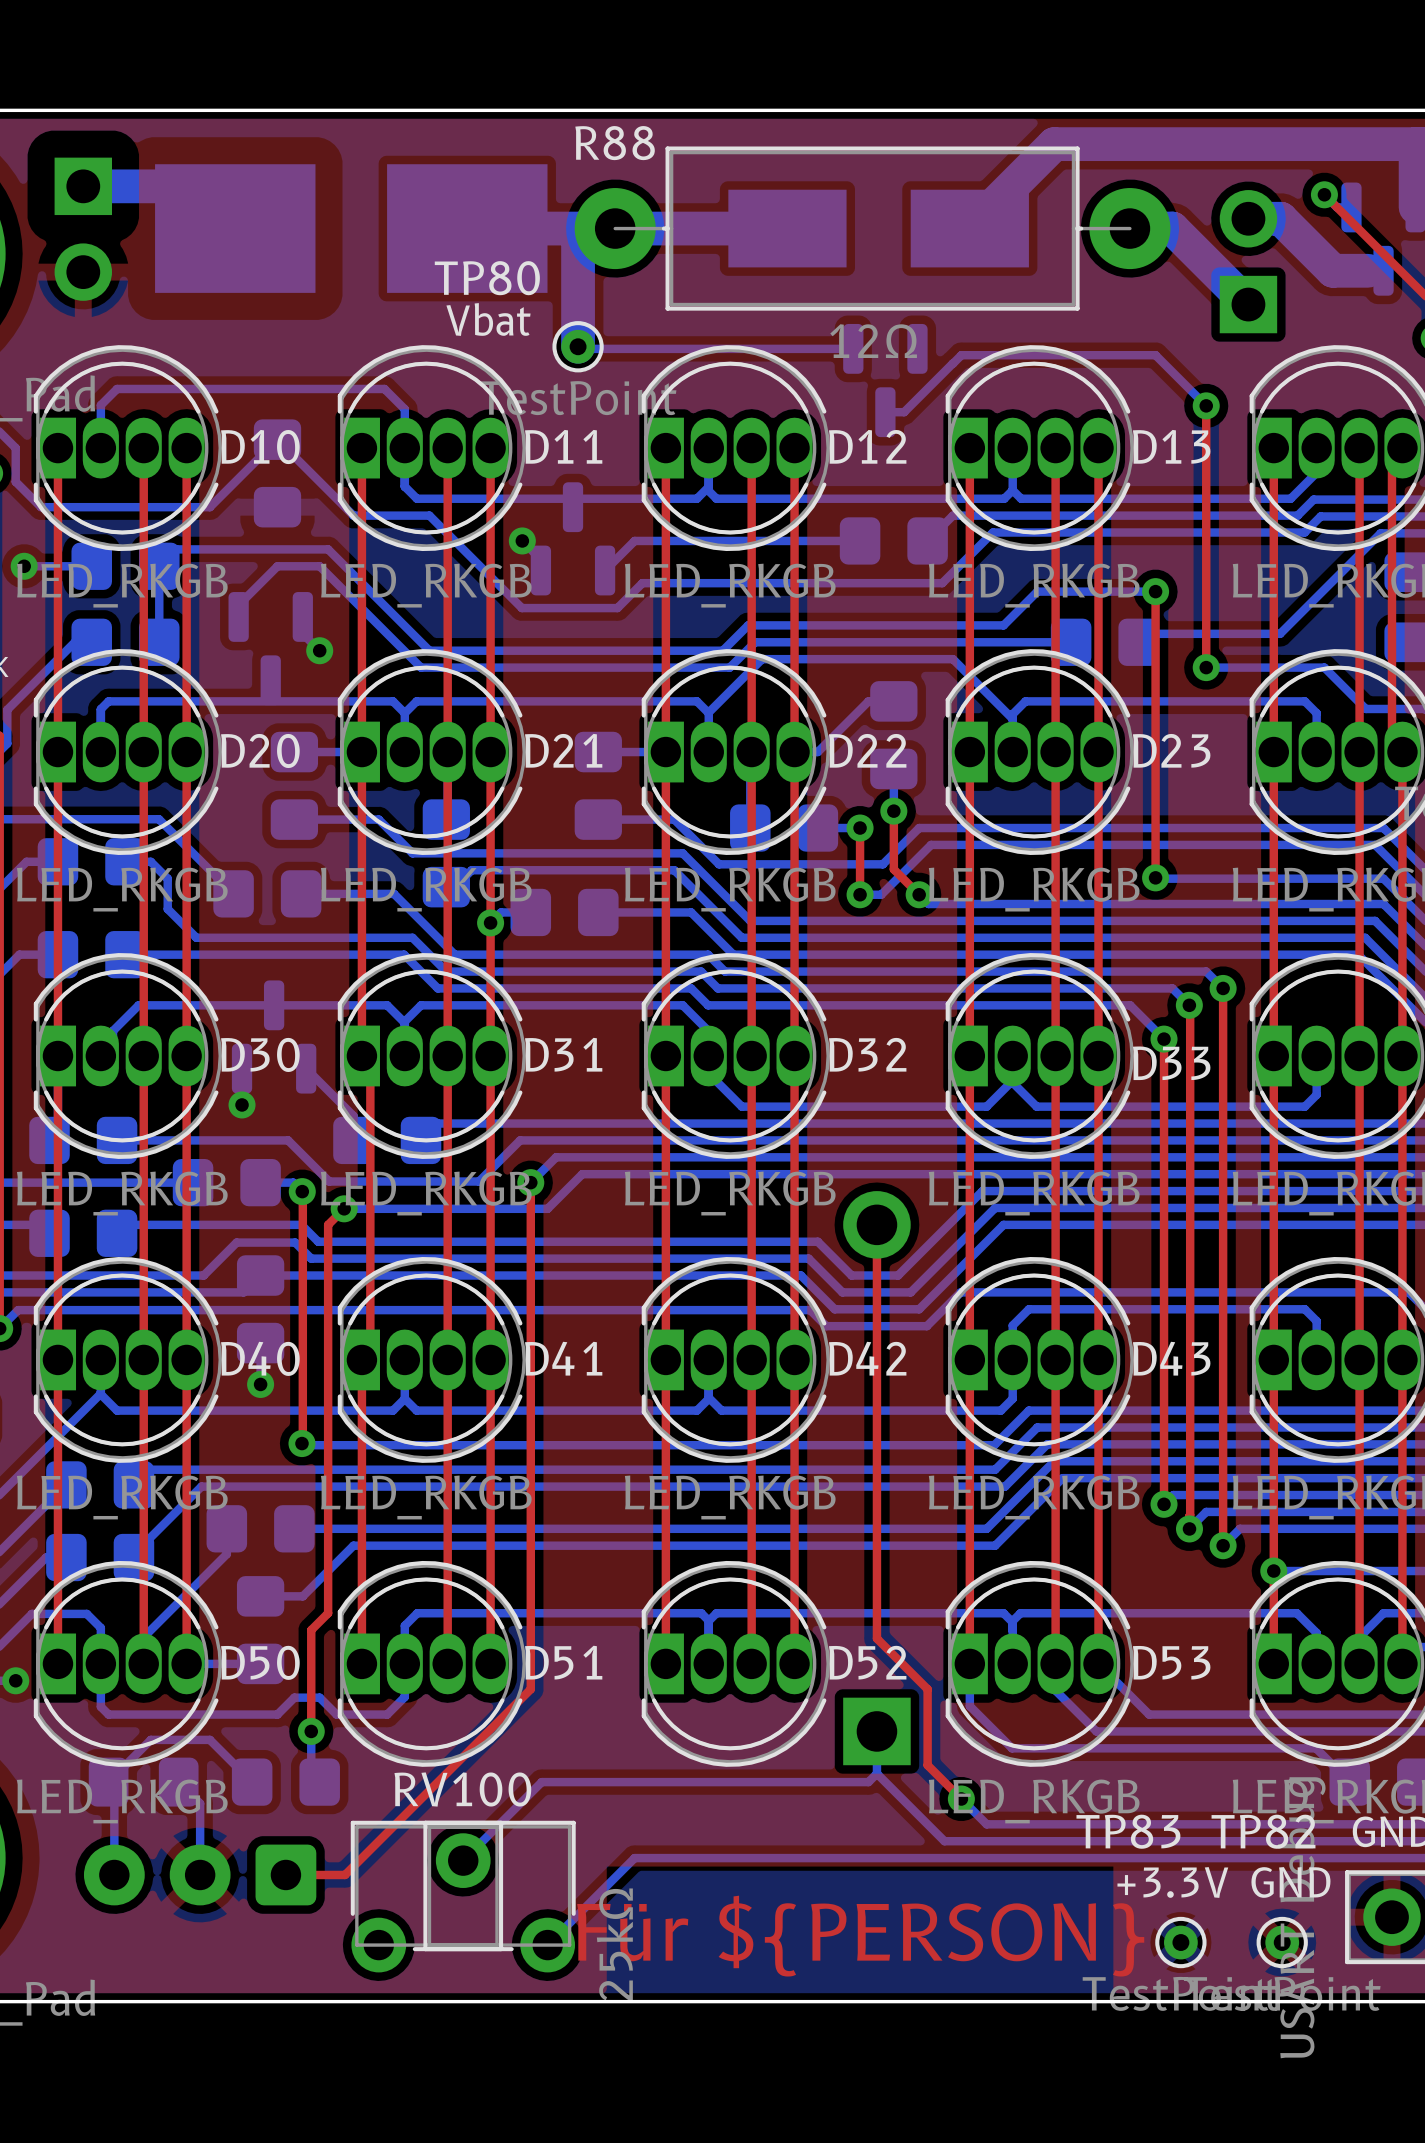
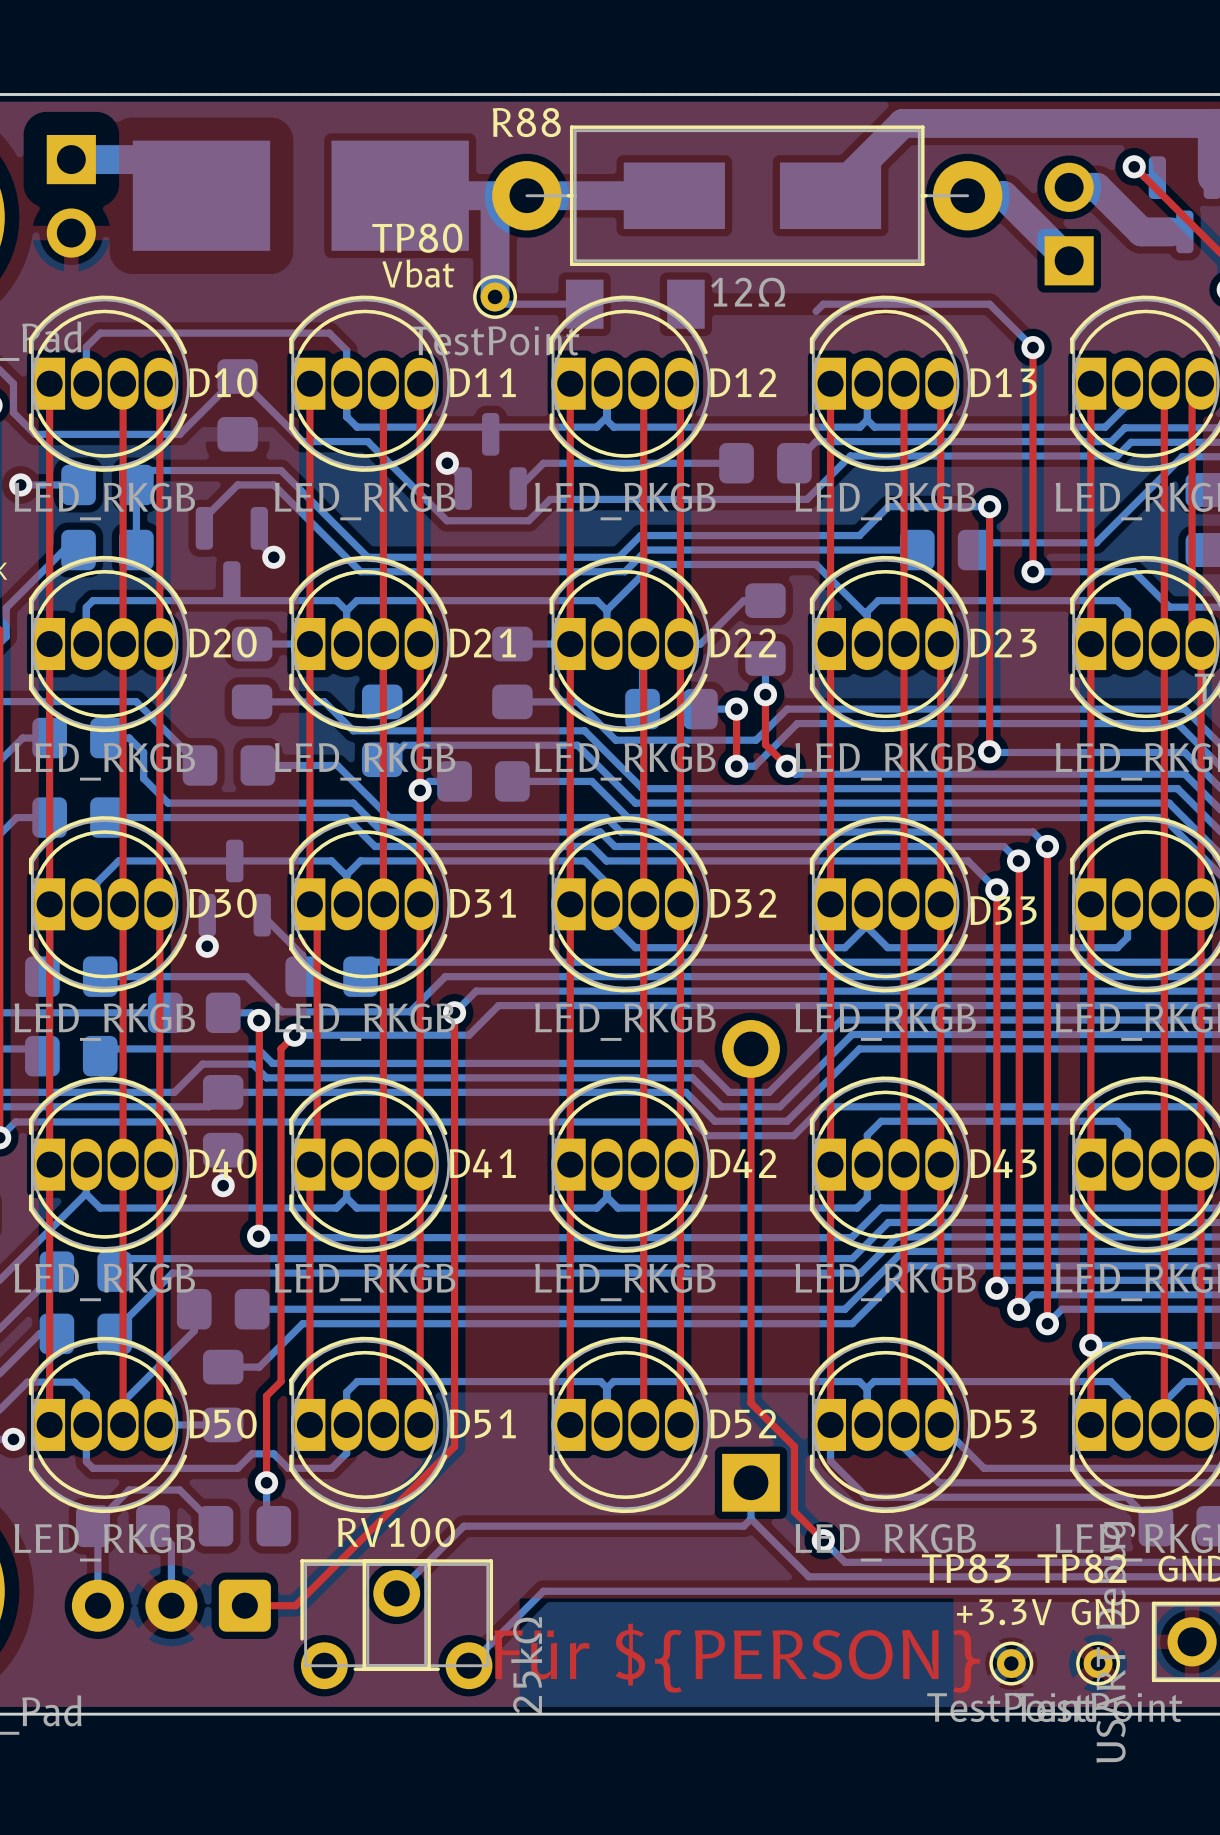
bottom track: (580, 348) (853, 348) -> (496, 298) (502, 304) (584, 304)
part: none -> (635, 304)
bottom track: (952, 363) (904, 412) (885, 412) -> none
part: (885, 380) -> none

